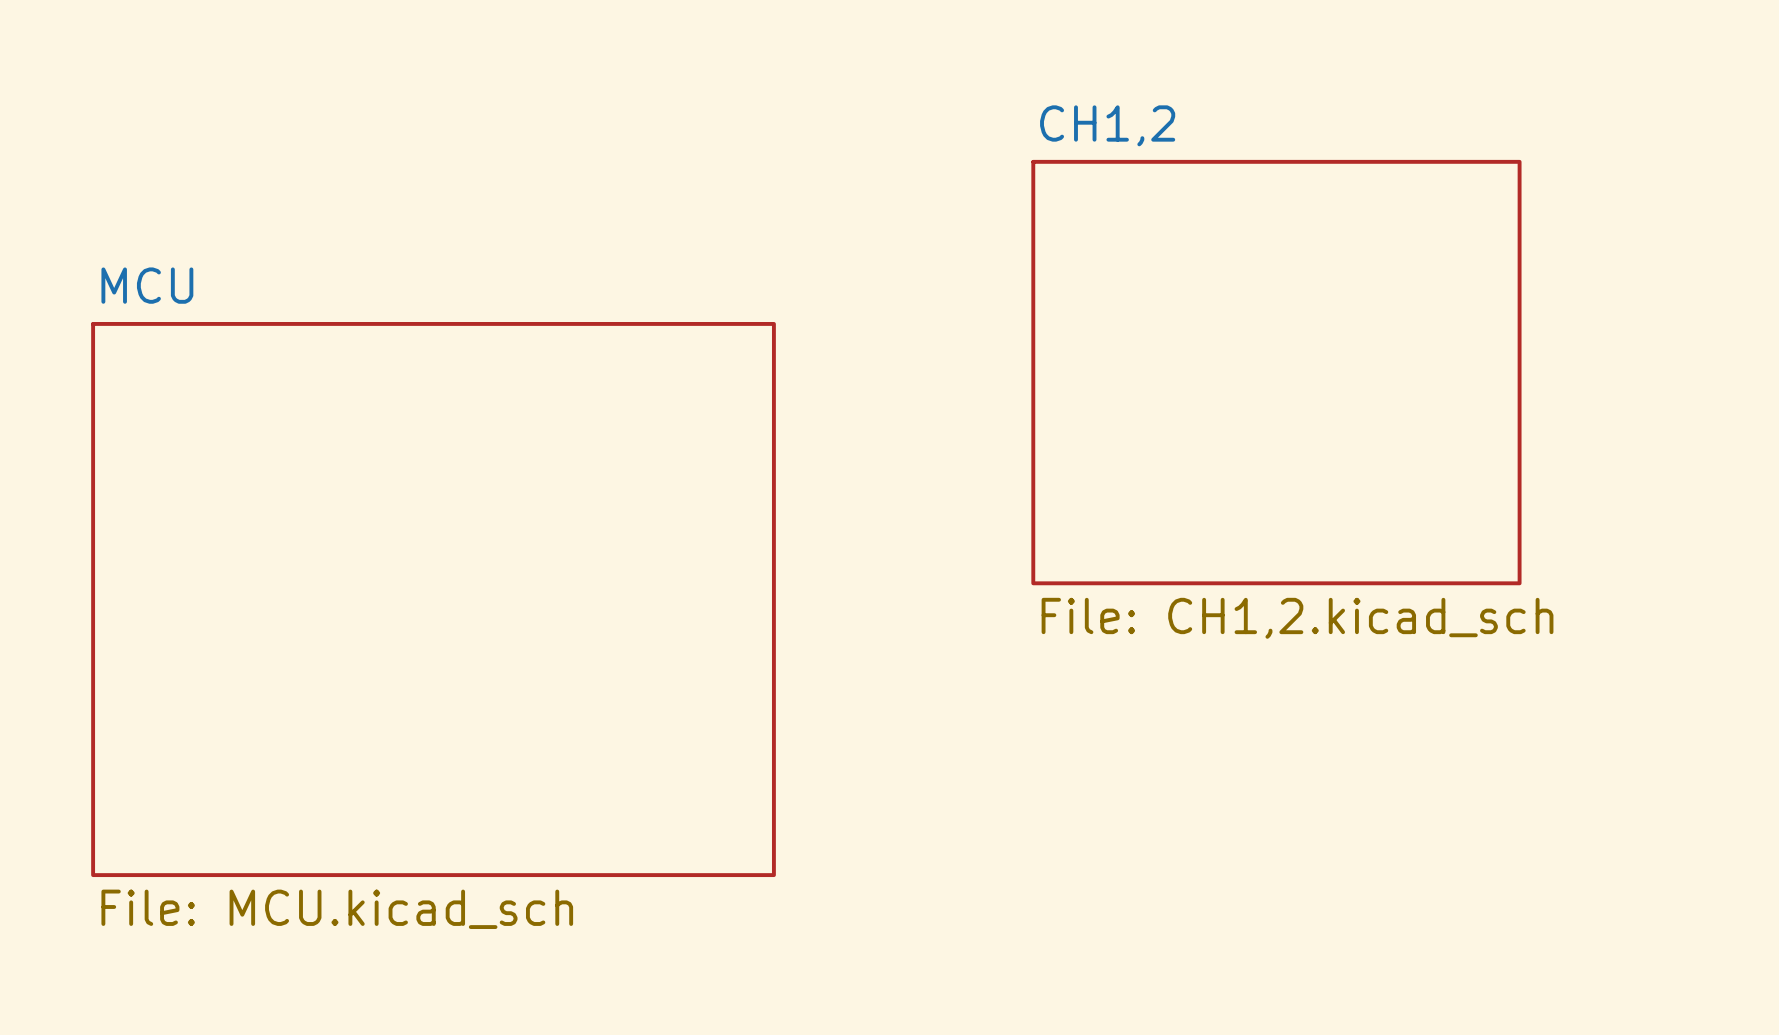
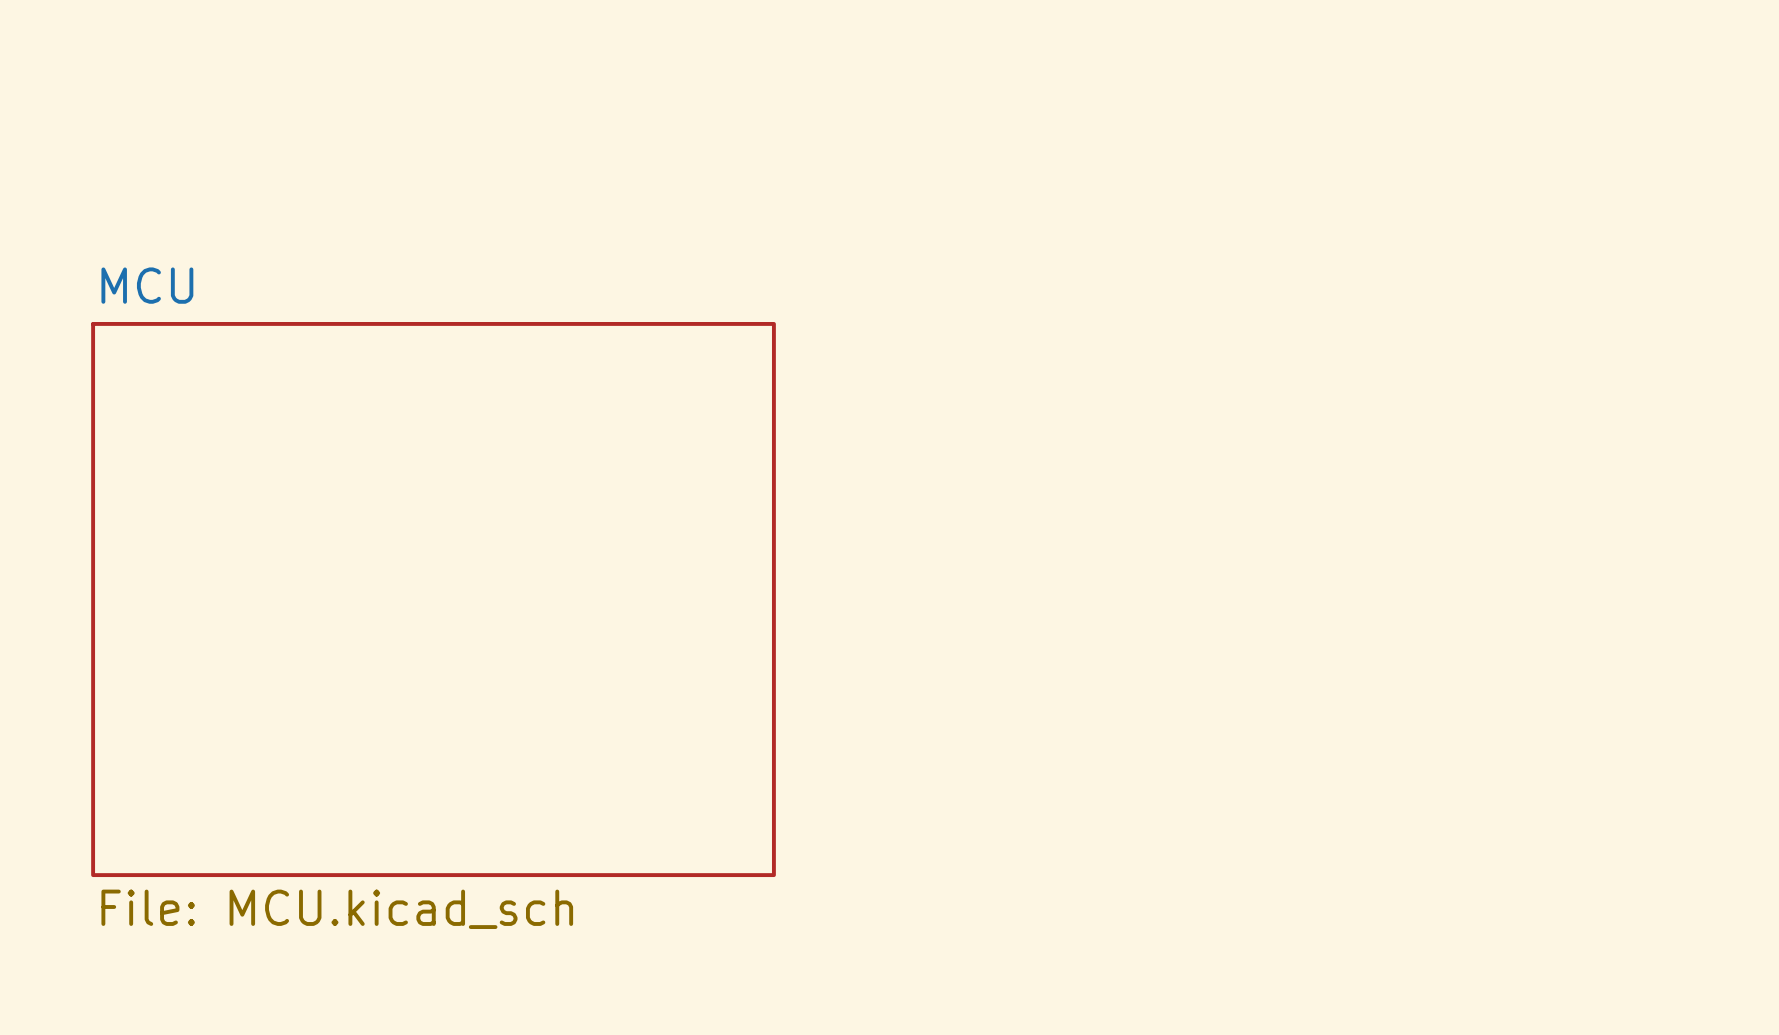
sheet CH1,2: File: CH1,2.kicad_sch (1276, 372) -> none

